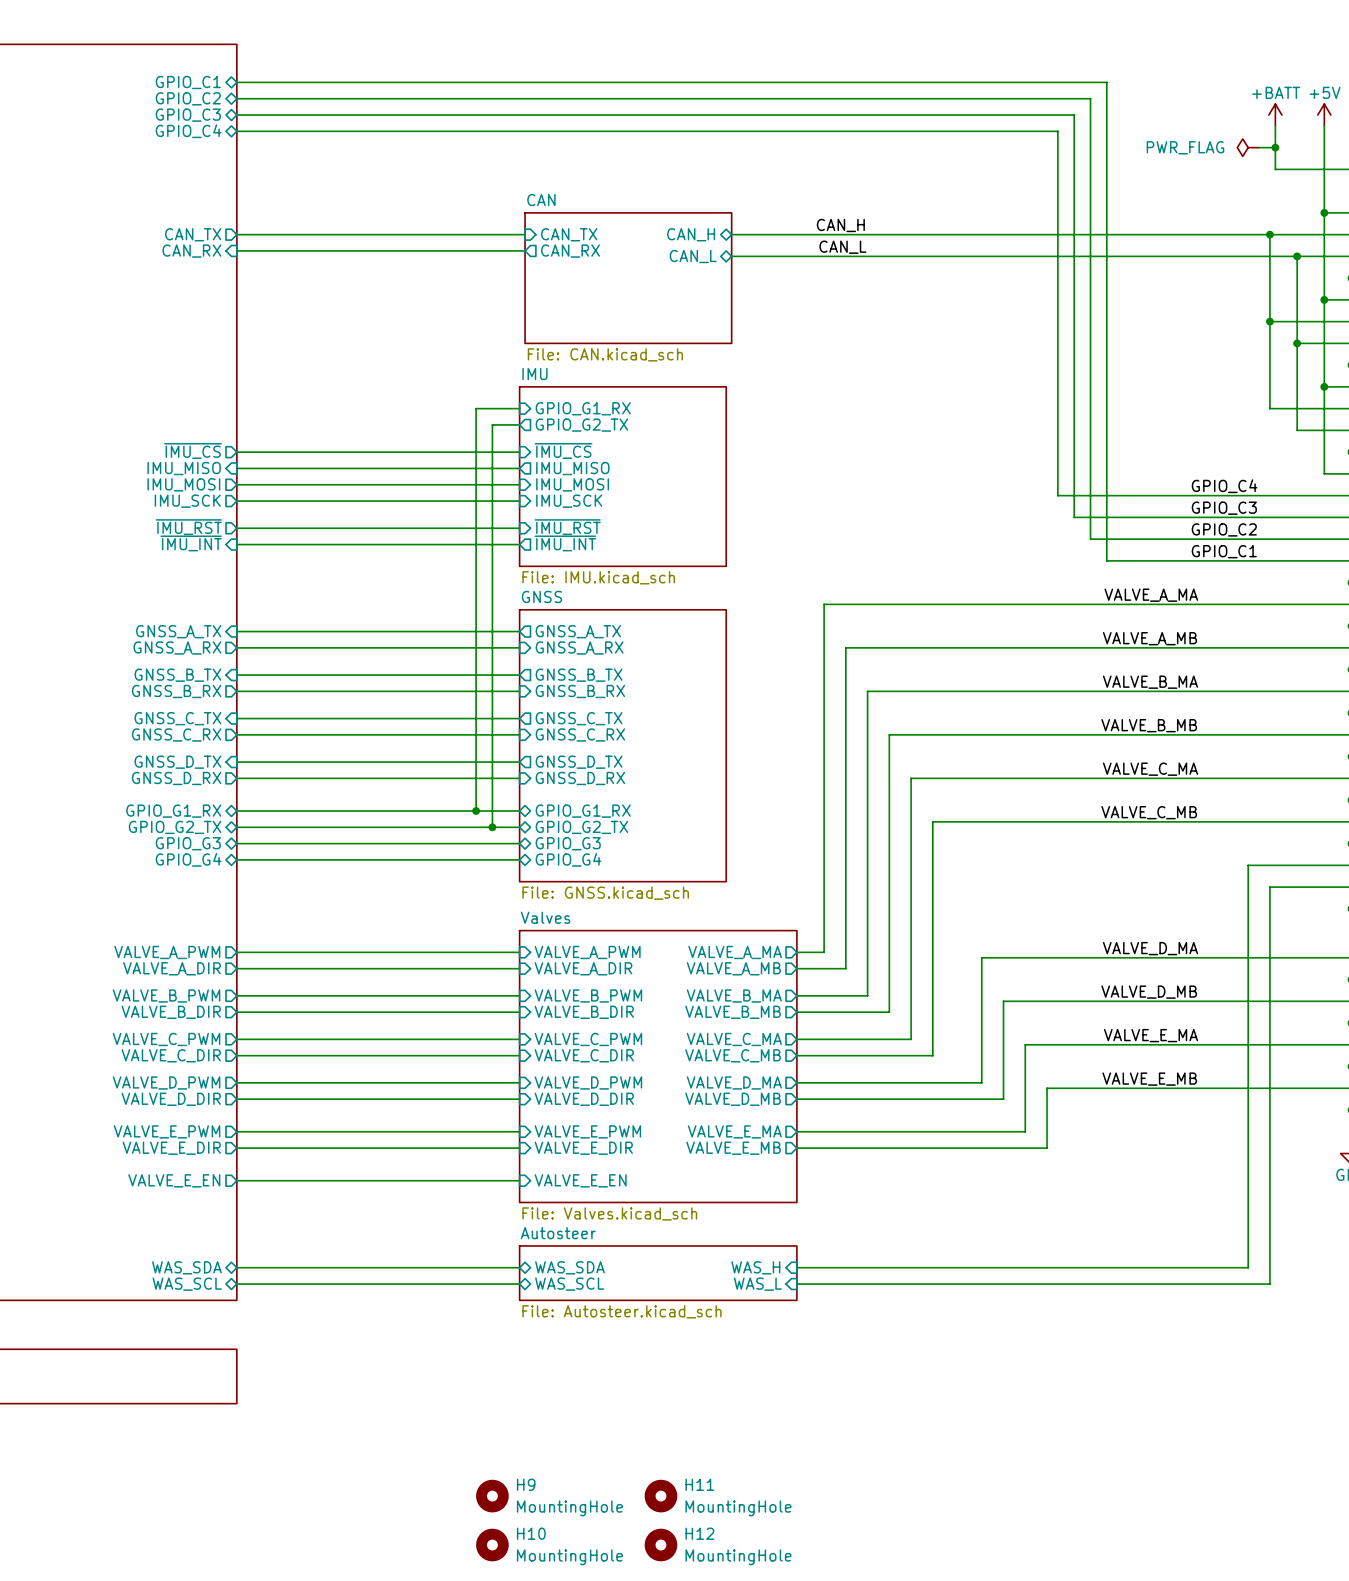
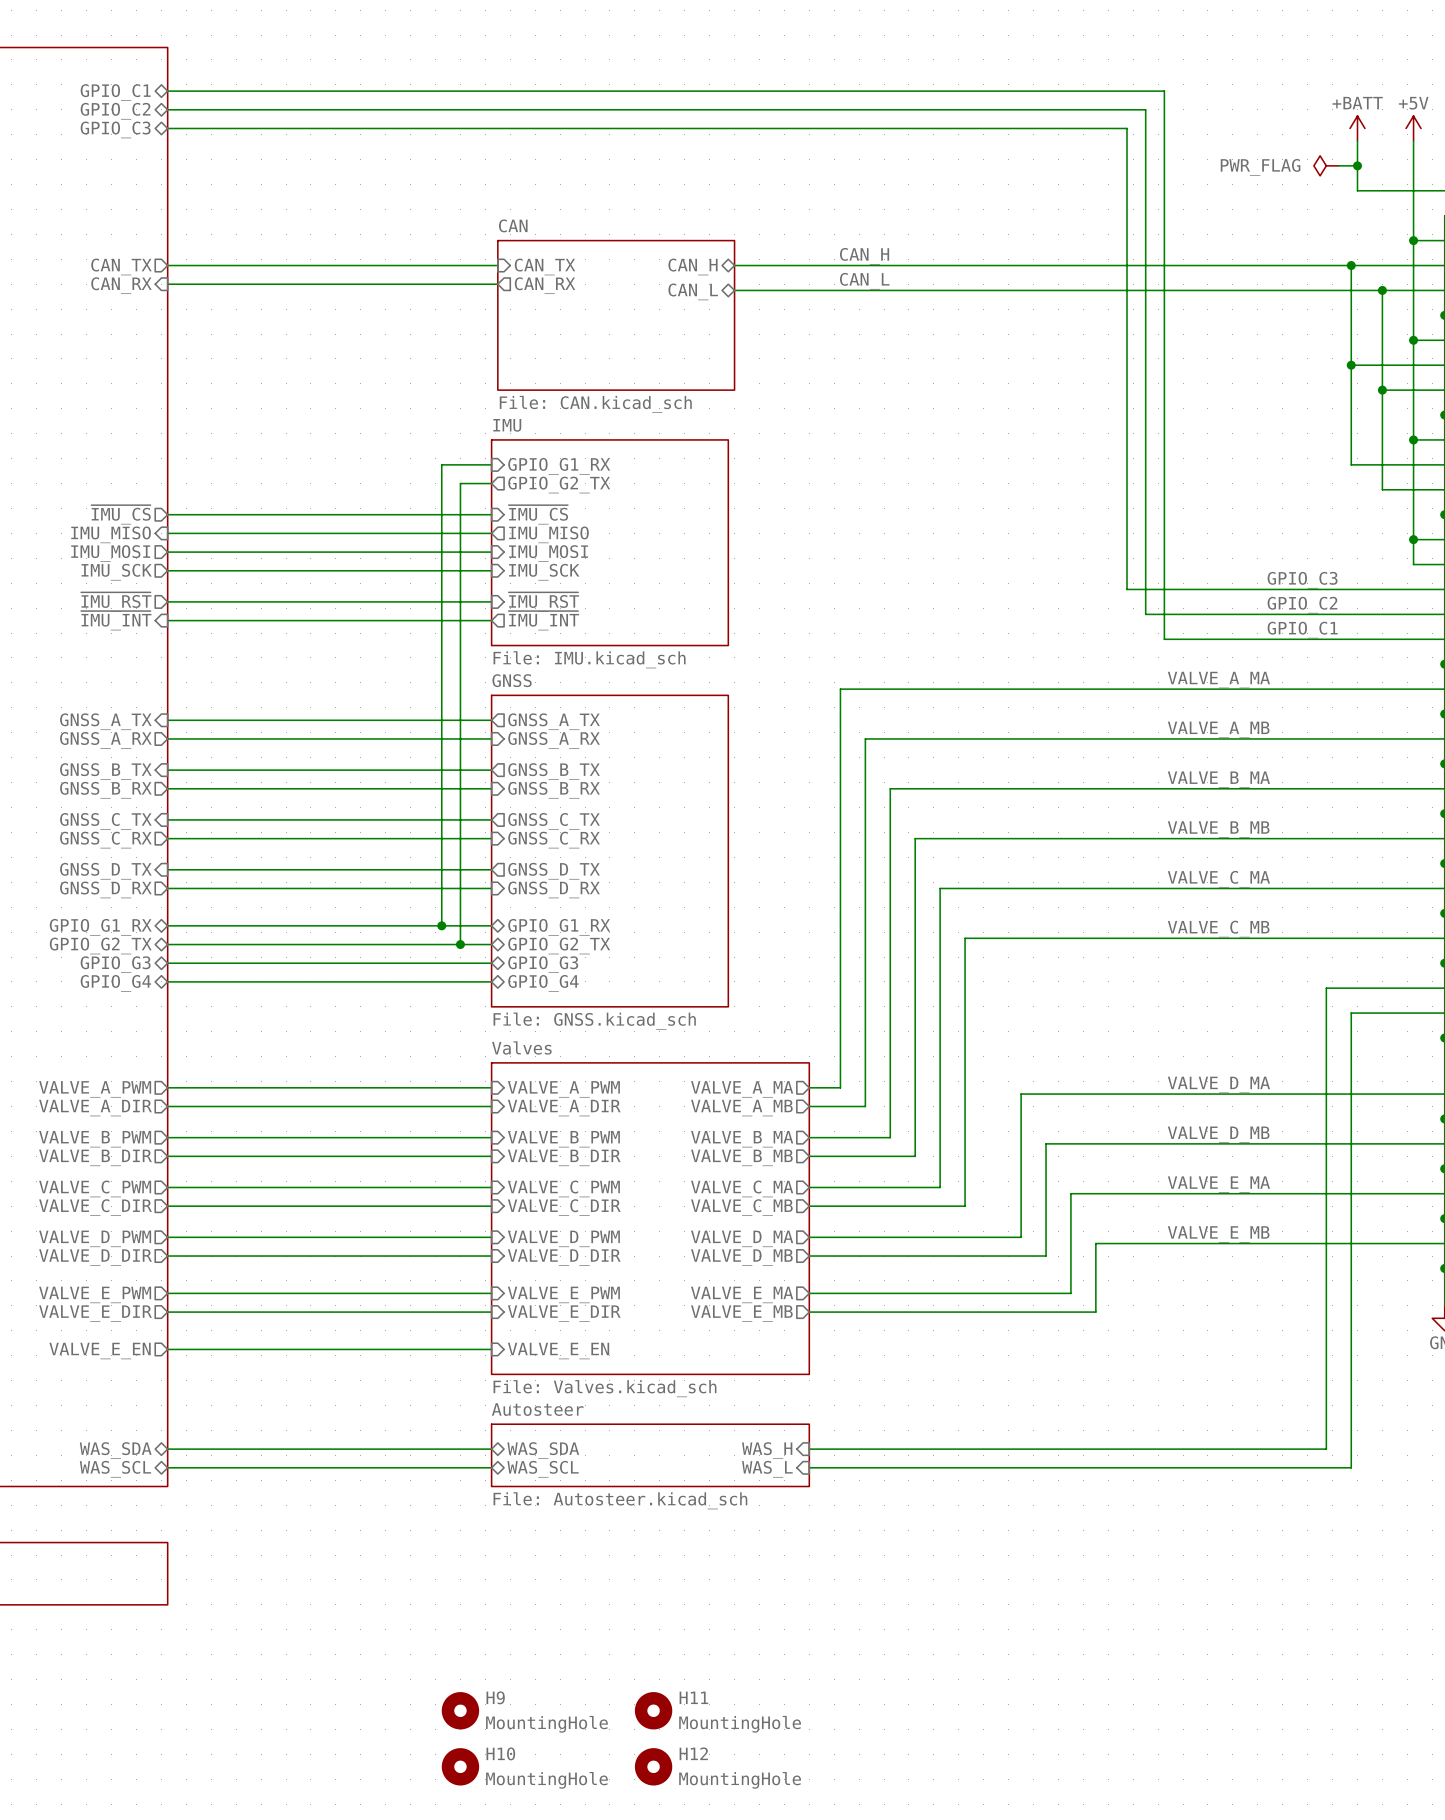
sheet pin: GPIO_C4 (188, 131) -> none
wire: (236, 131) (1057, 131) (1057, 495) (1324, 495) -> (1413, 539) (1413, 564)
junction: none -> (1413, 539)
label: GPIO_C4 (1224, 486) -> none

